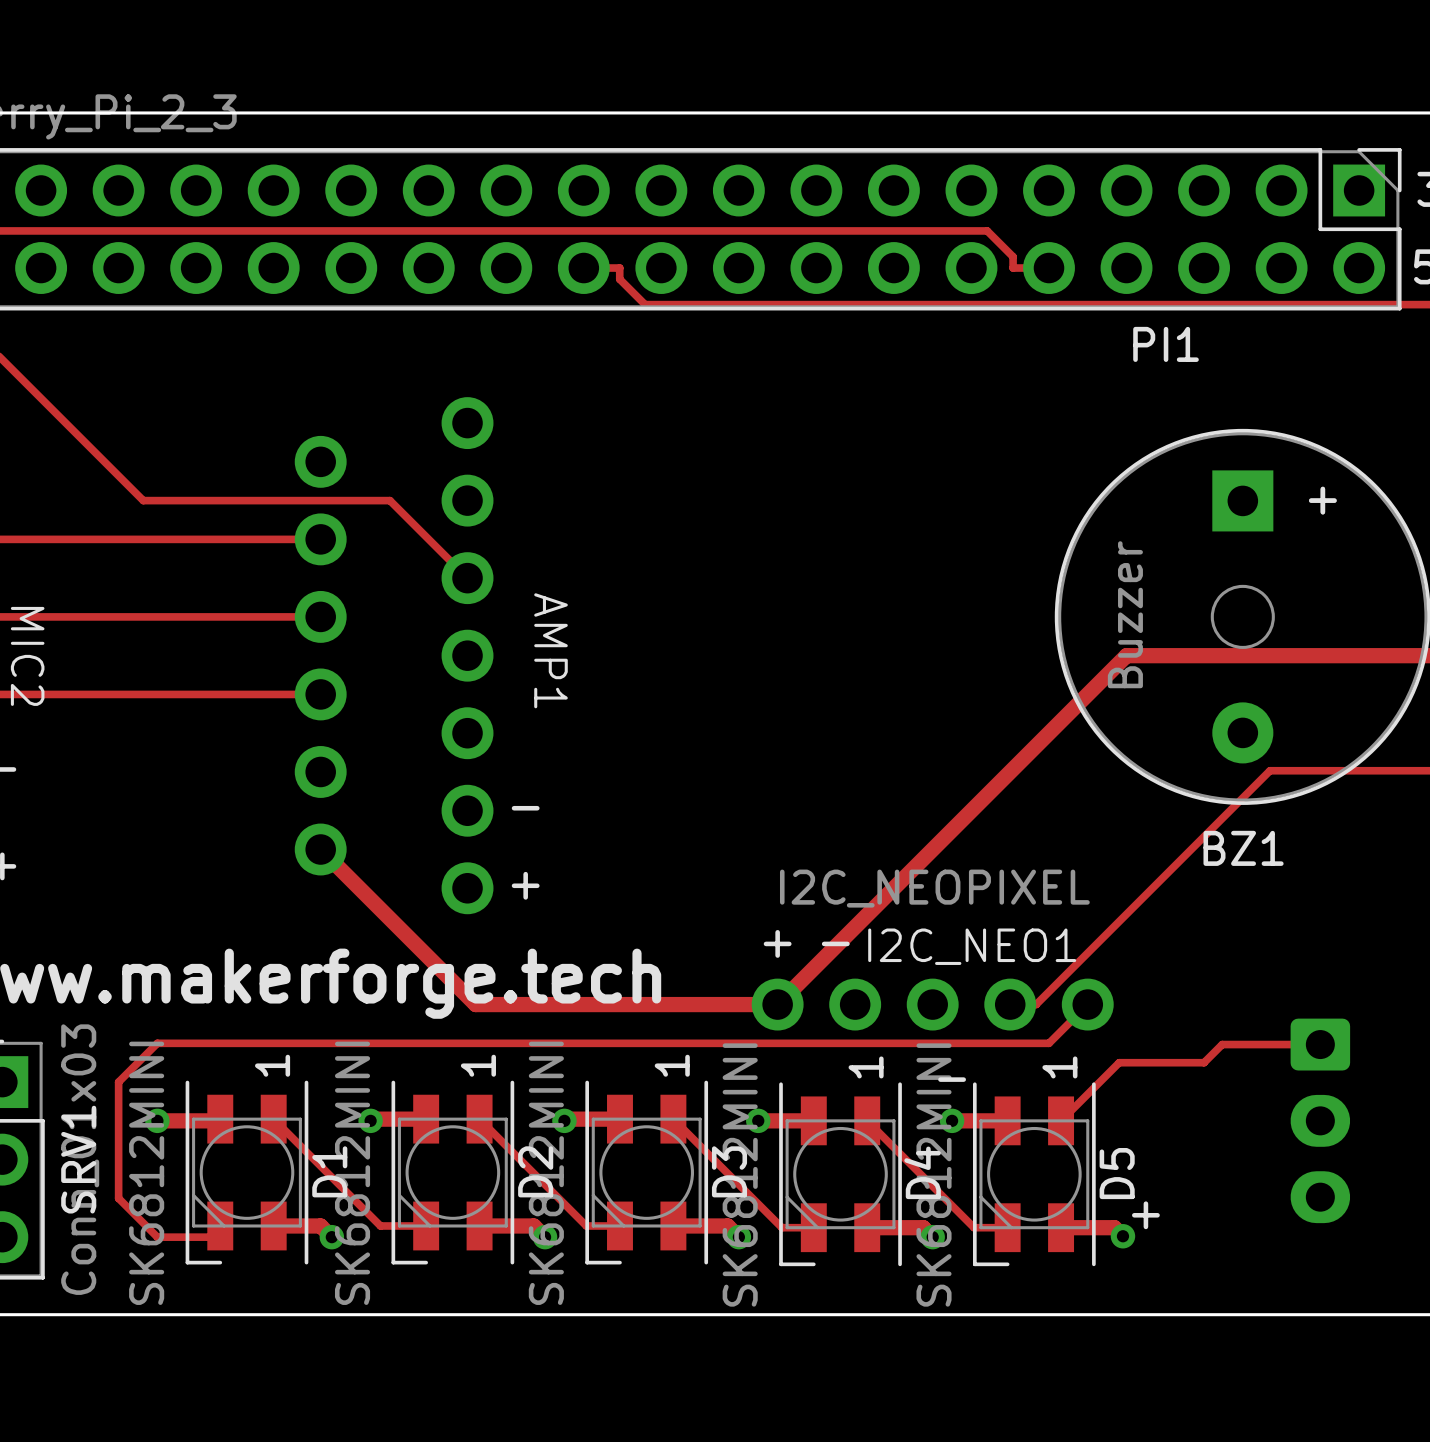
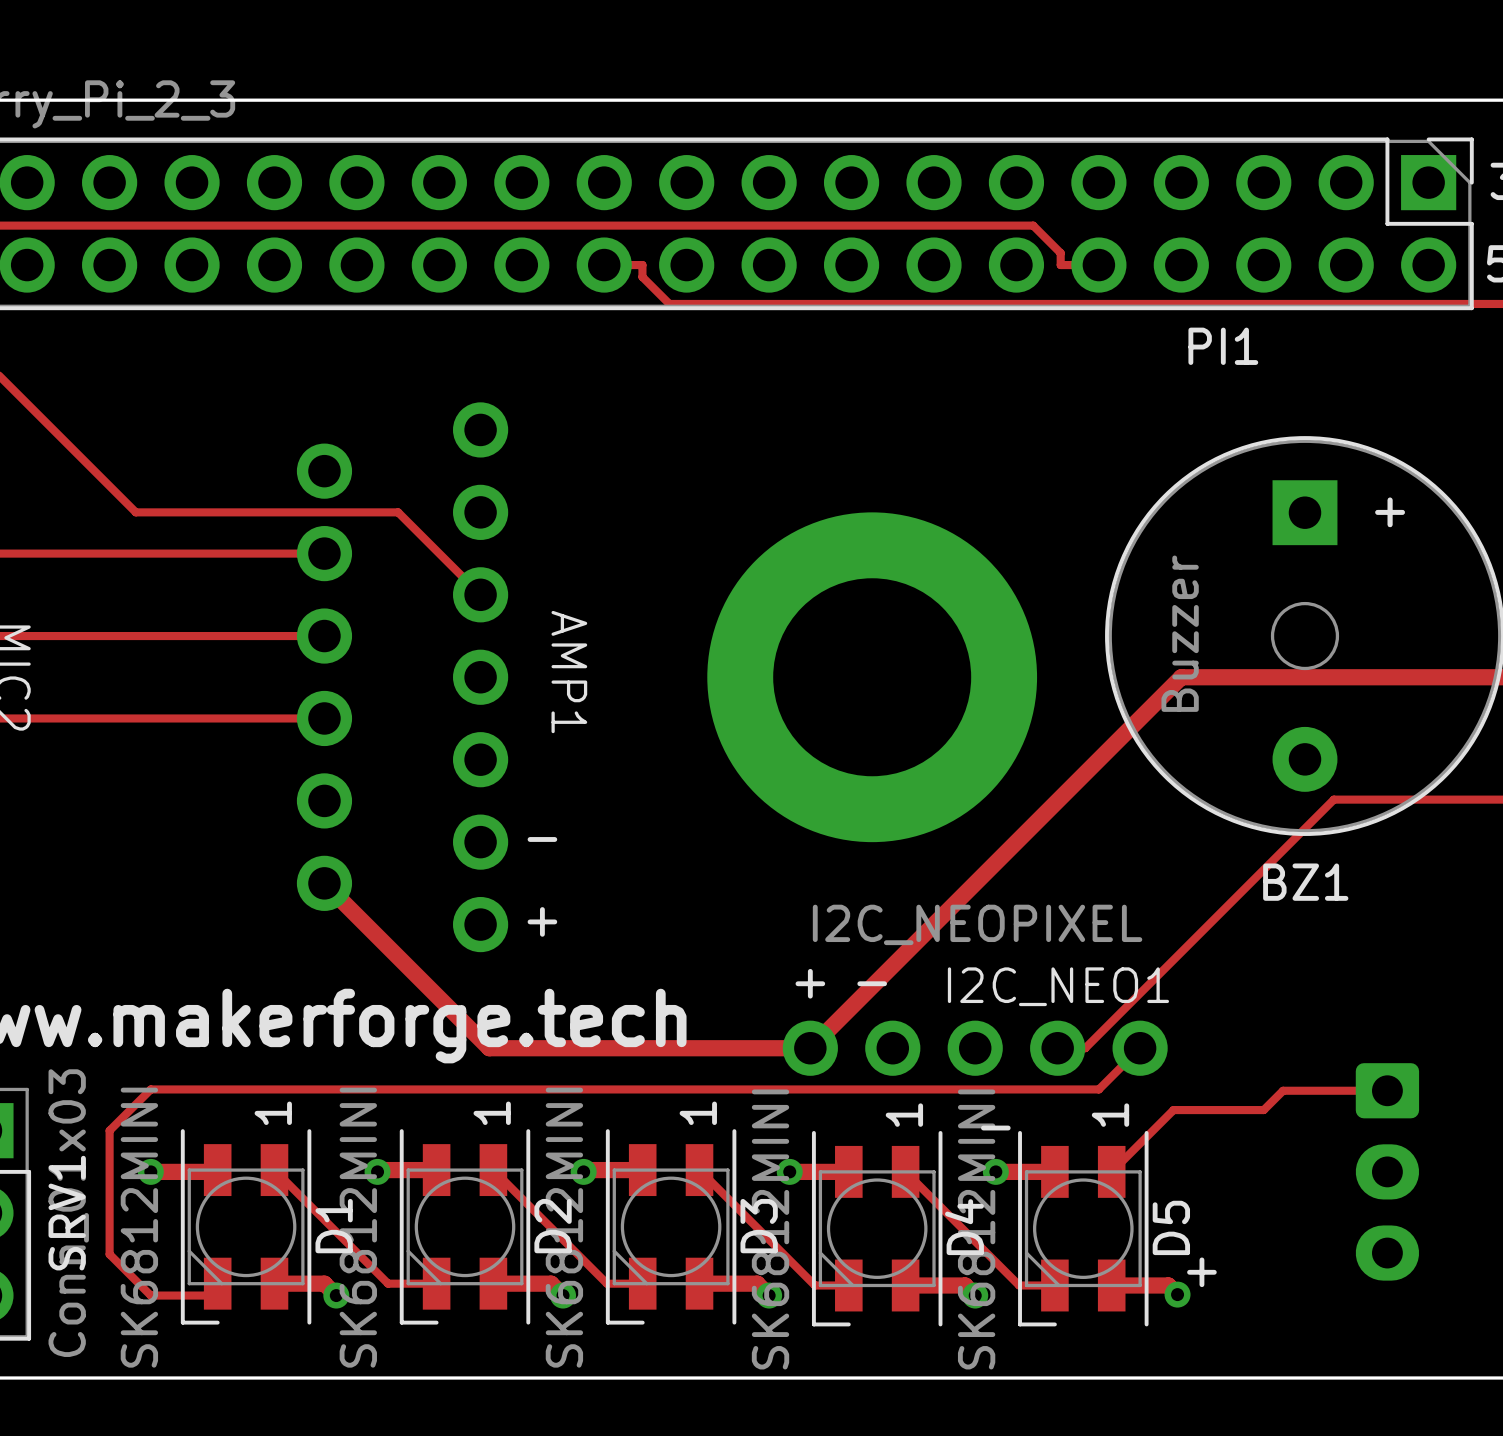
part: none -> (872, 677)
I2C_NEO1 name position: I2C_NEO1 (972, 946) -> I2C_NEO1 (1058, 986)

